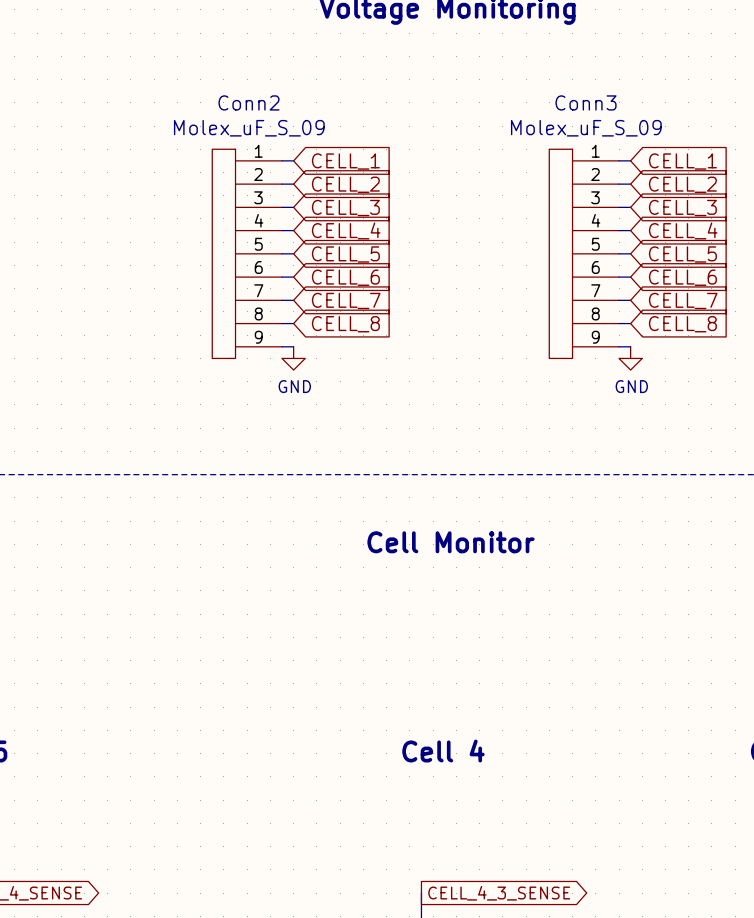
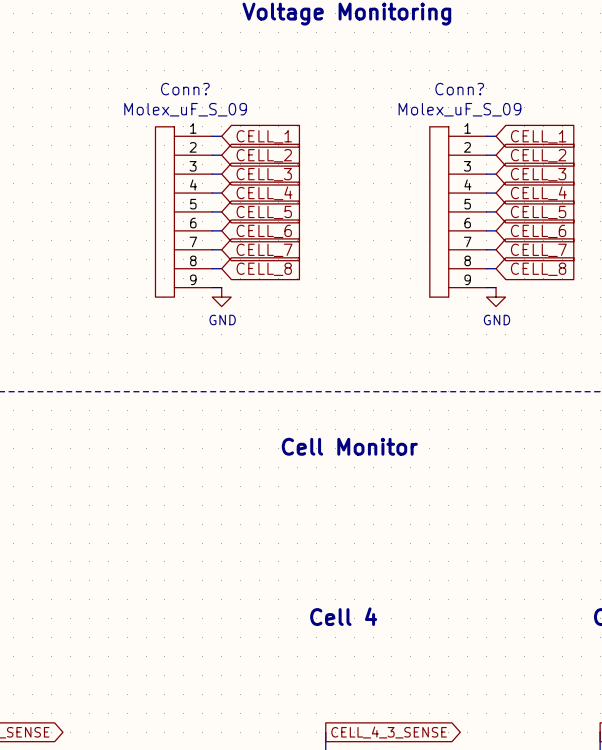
Conn2 name: Conn2 (248, 102) -> Conn? (185, 89)
Conn3 name: Conn3 (586, 102) -> Conn? (459, 89)

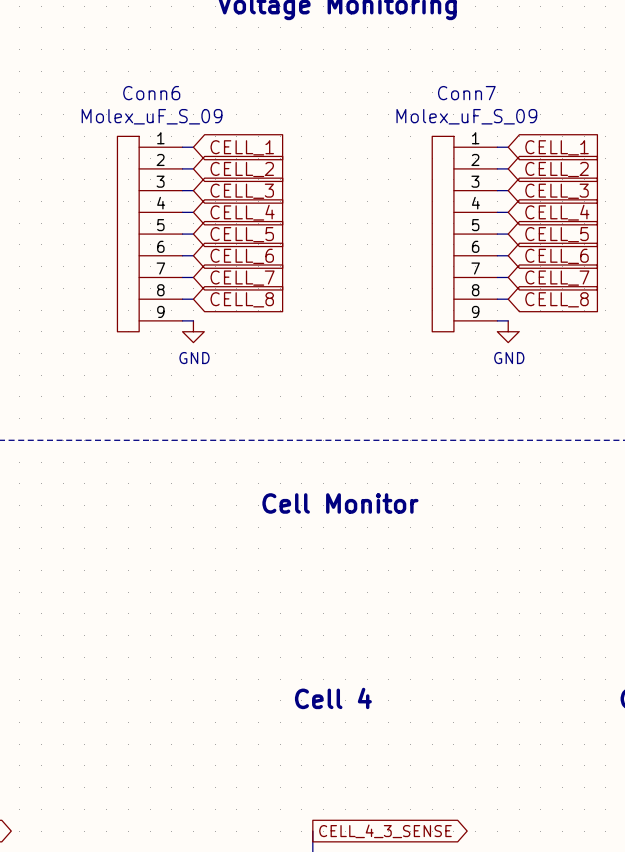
Conn? name: Conn? (185, 89) -> Conn6 (151, 93)
Conn? name: Conn? (459, 89) -> Conn7 (466, 93)

